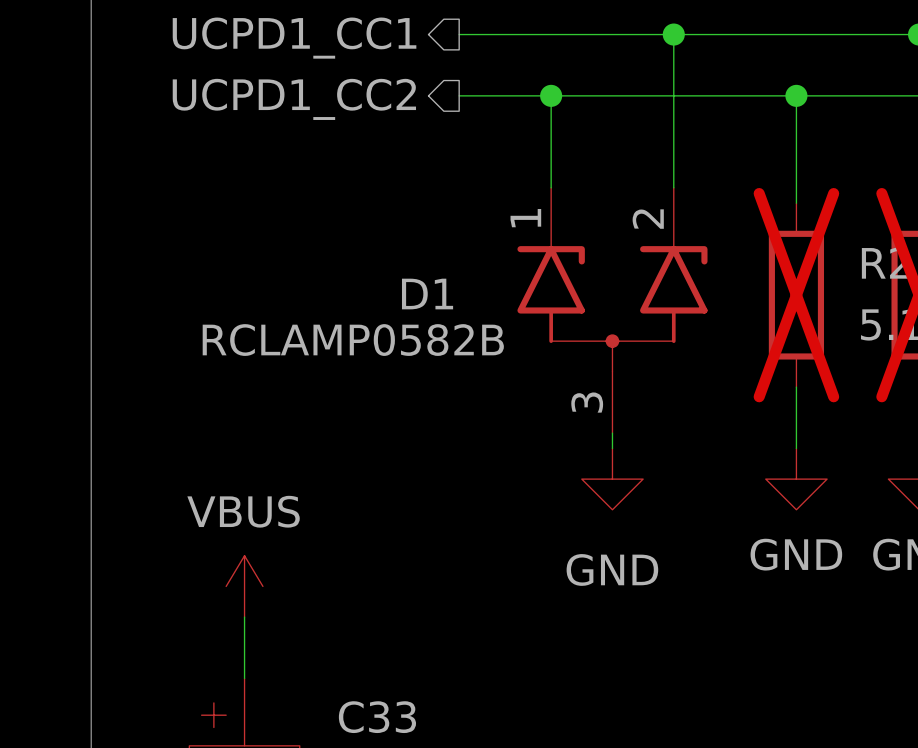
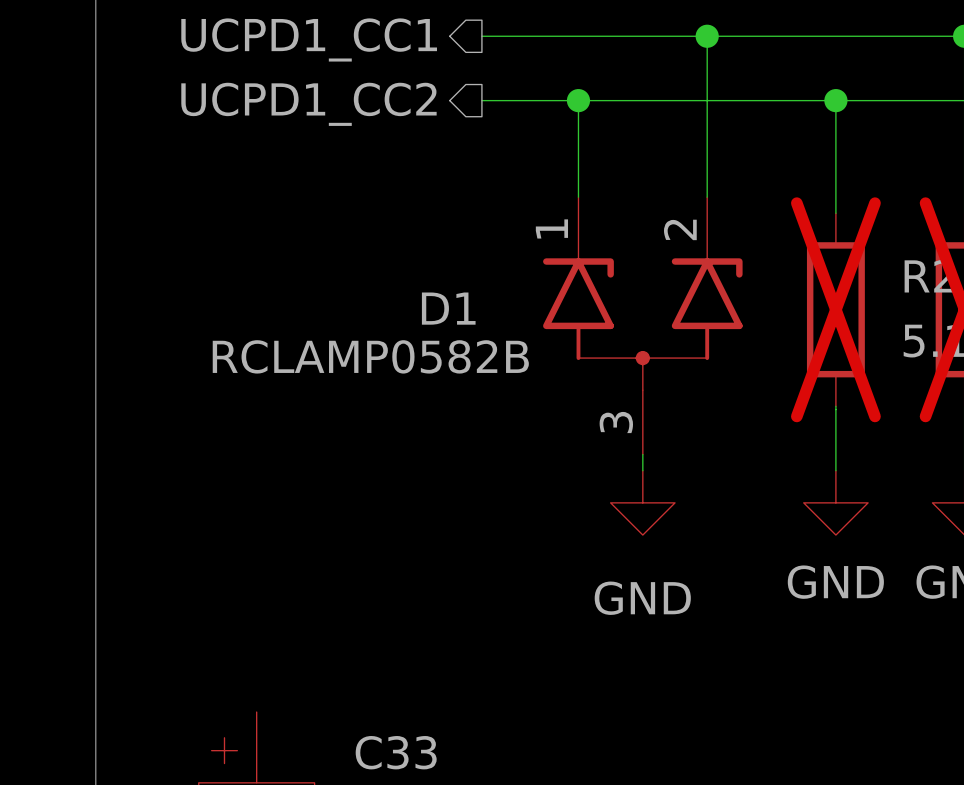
power symbol: VBUS (244, 586) -> none
wire: (244, 617) (244, 678) -> none

